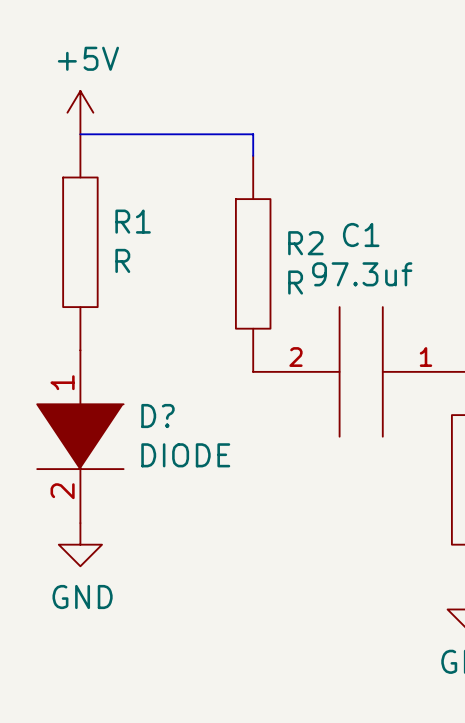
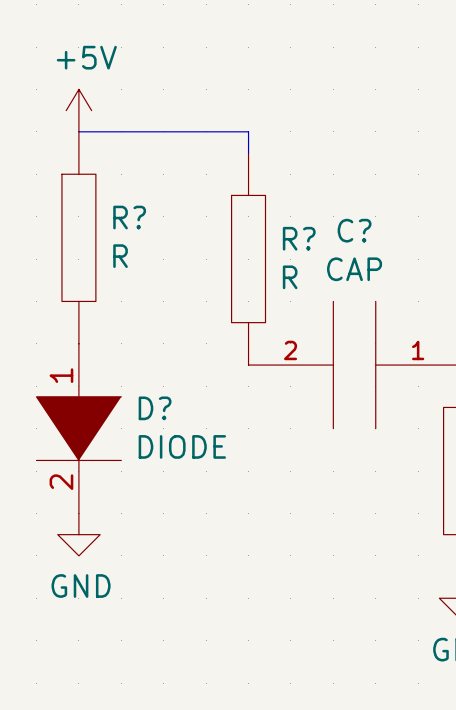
R1 name: R1 (133, 221) -> R? (129, 217)
C1 name: C1 (361, 235) -> C? (354, 230)
R2 name: R2 (305, 243) -> R? (299, 238)
C1 value: 97.3uf (362, 274) -> CAP (354, 269)

